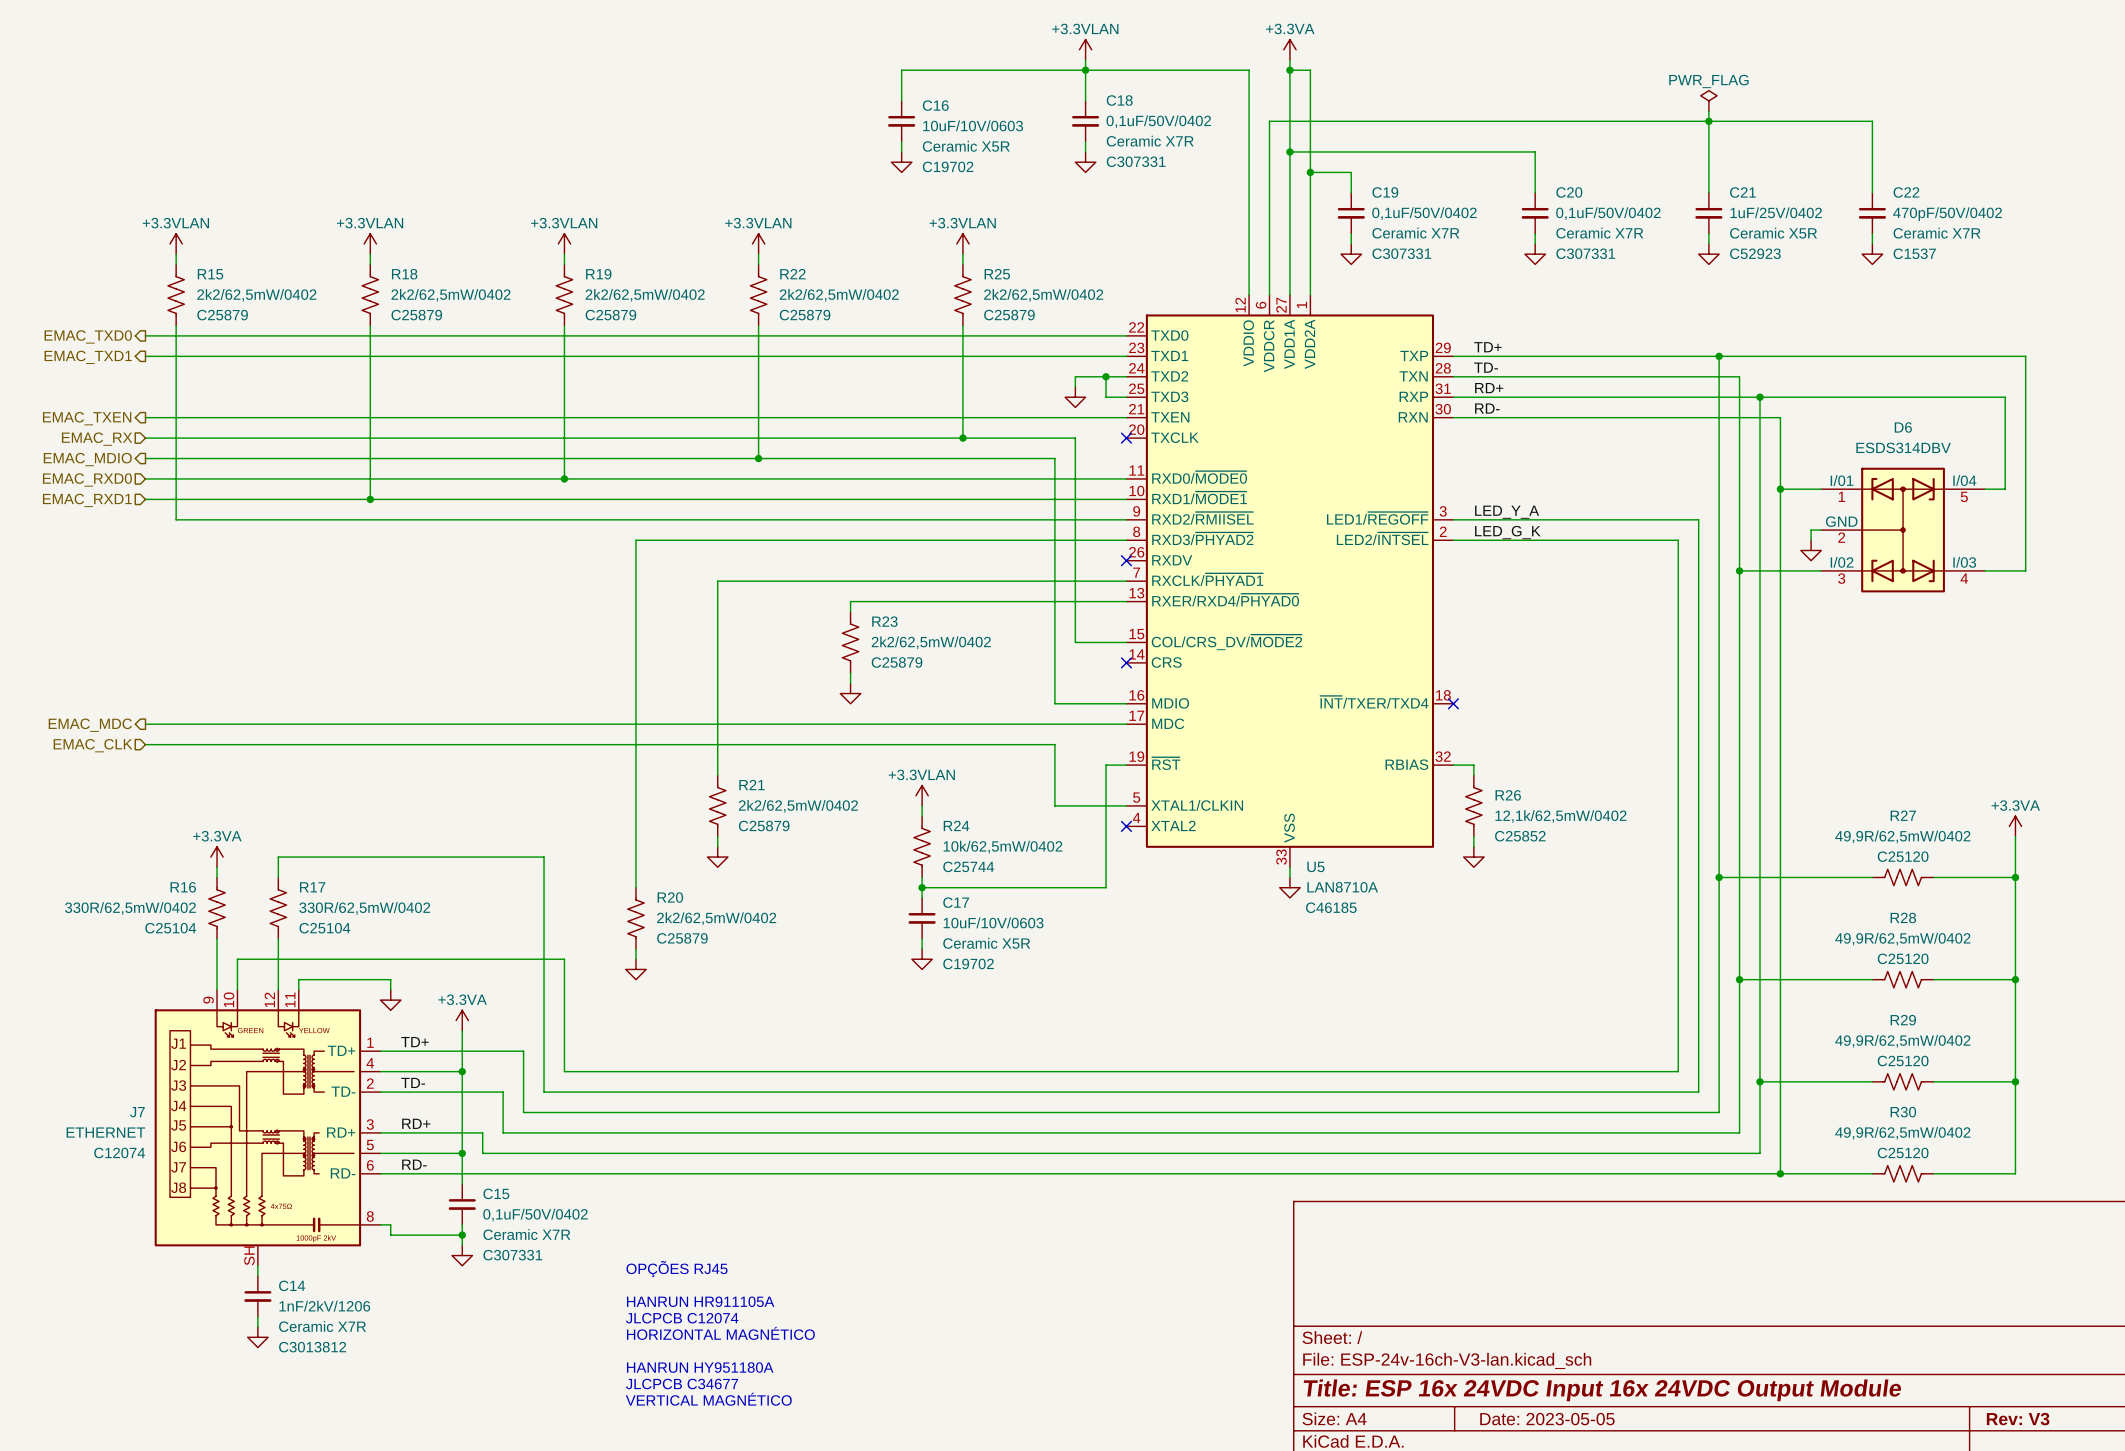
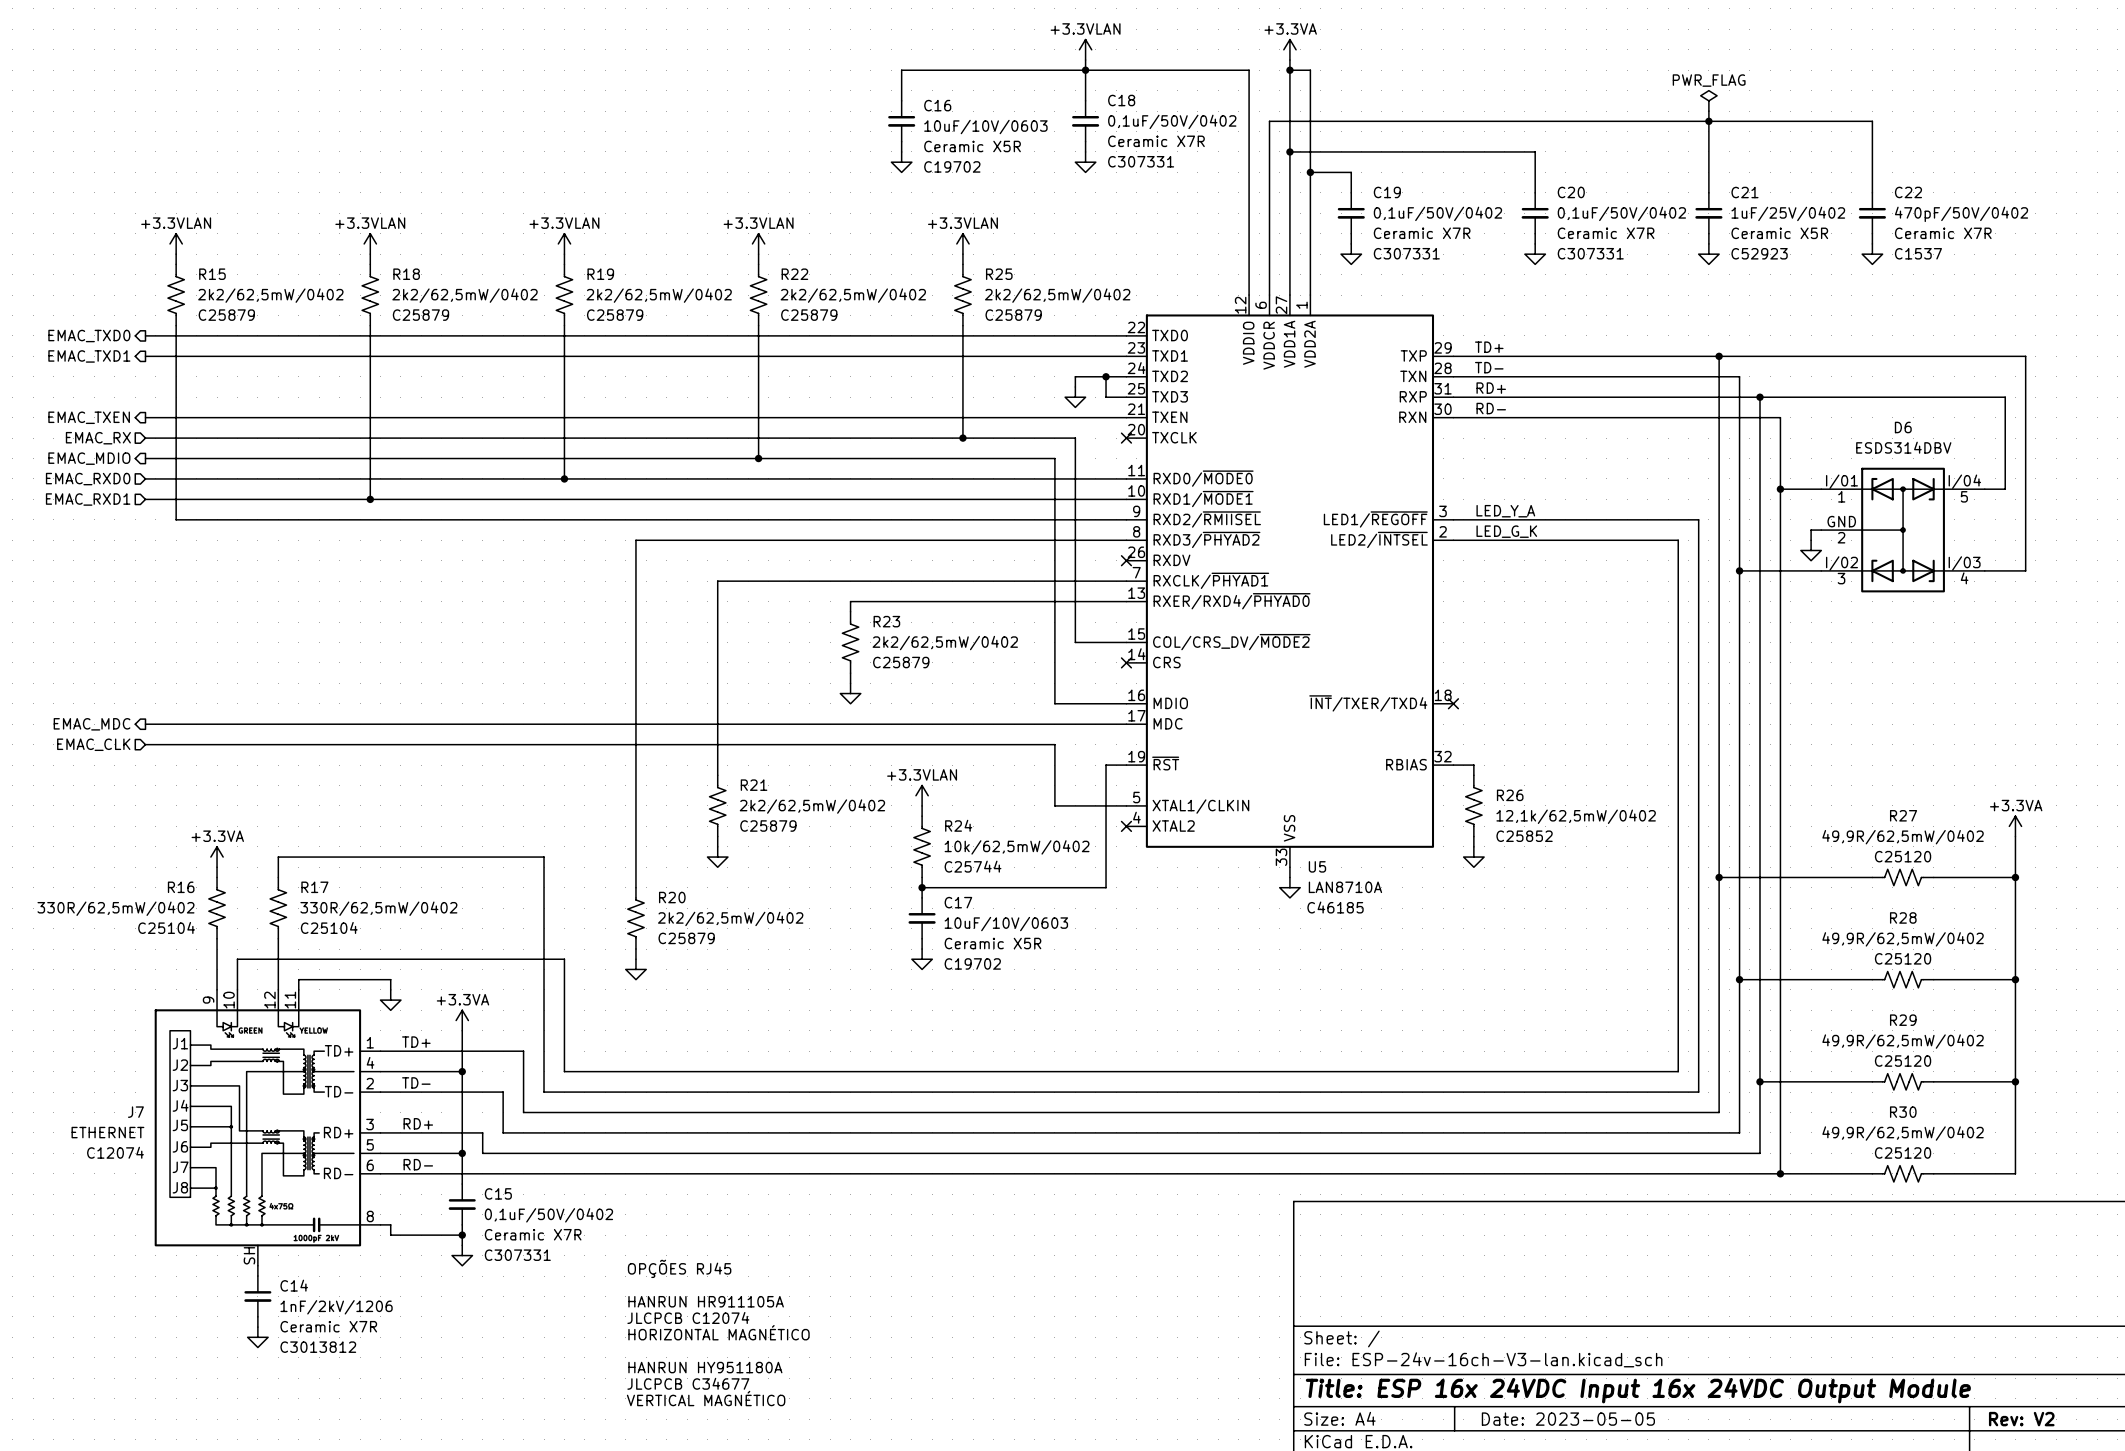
title block: Rev: V3 (2018, 1419) -> Rev: V2 (2021, 1419)

